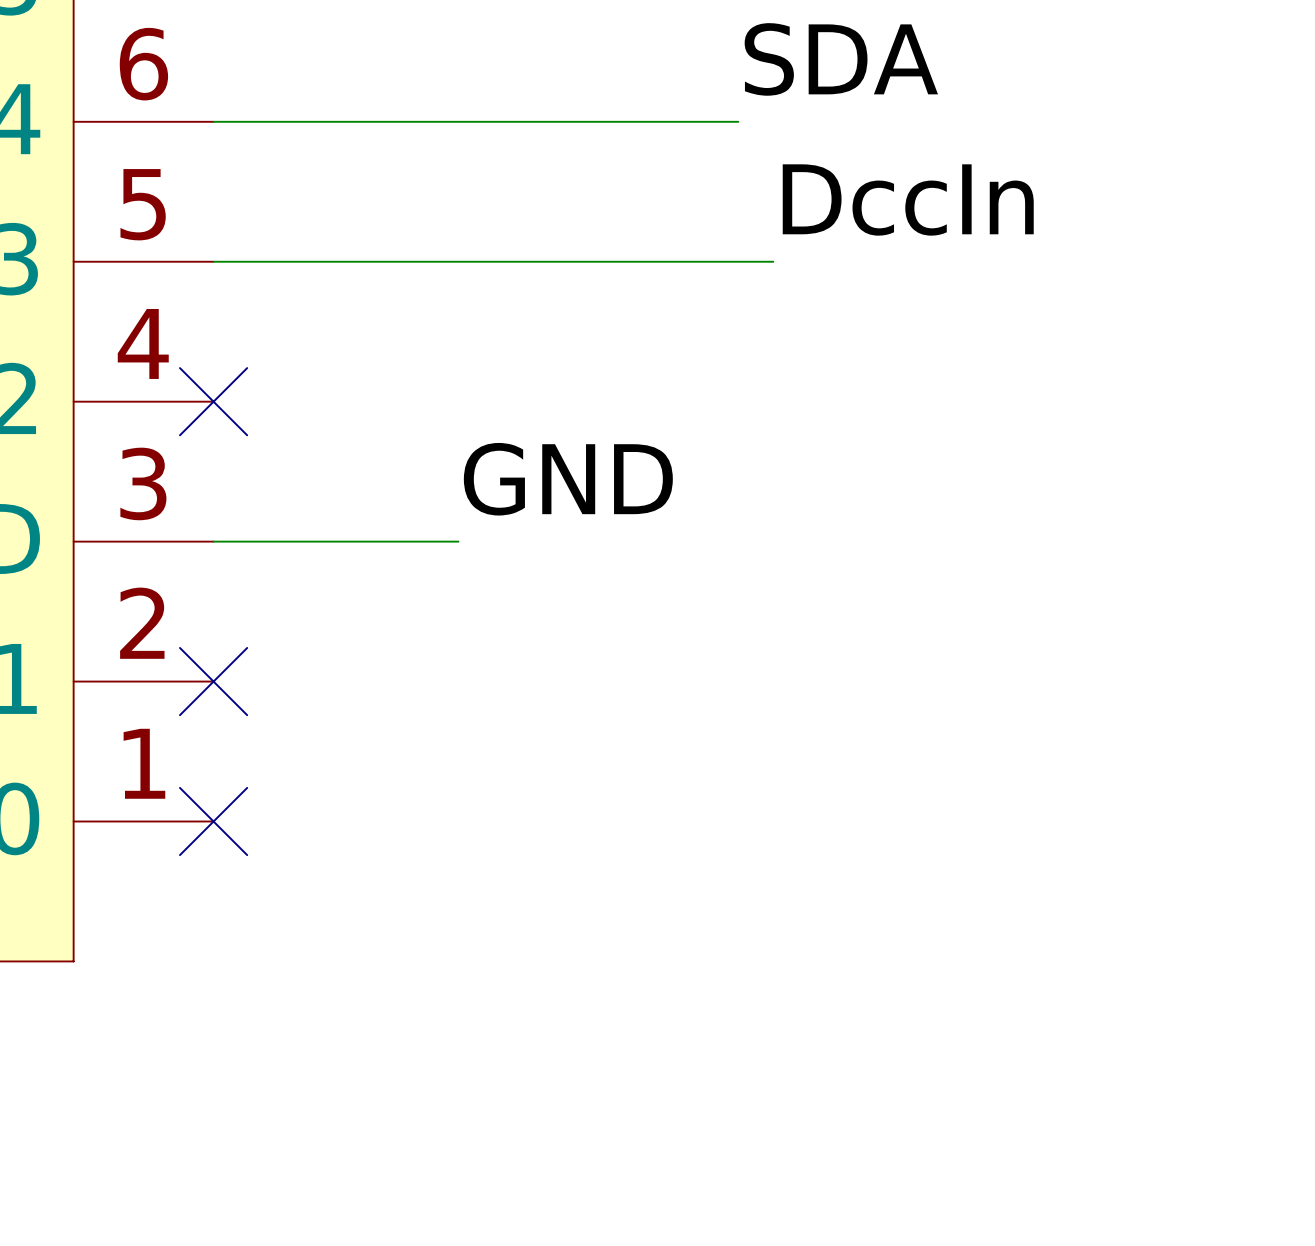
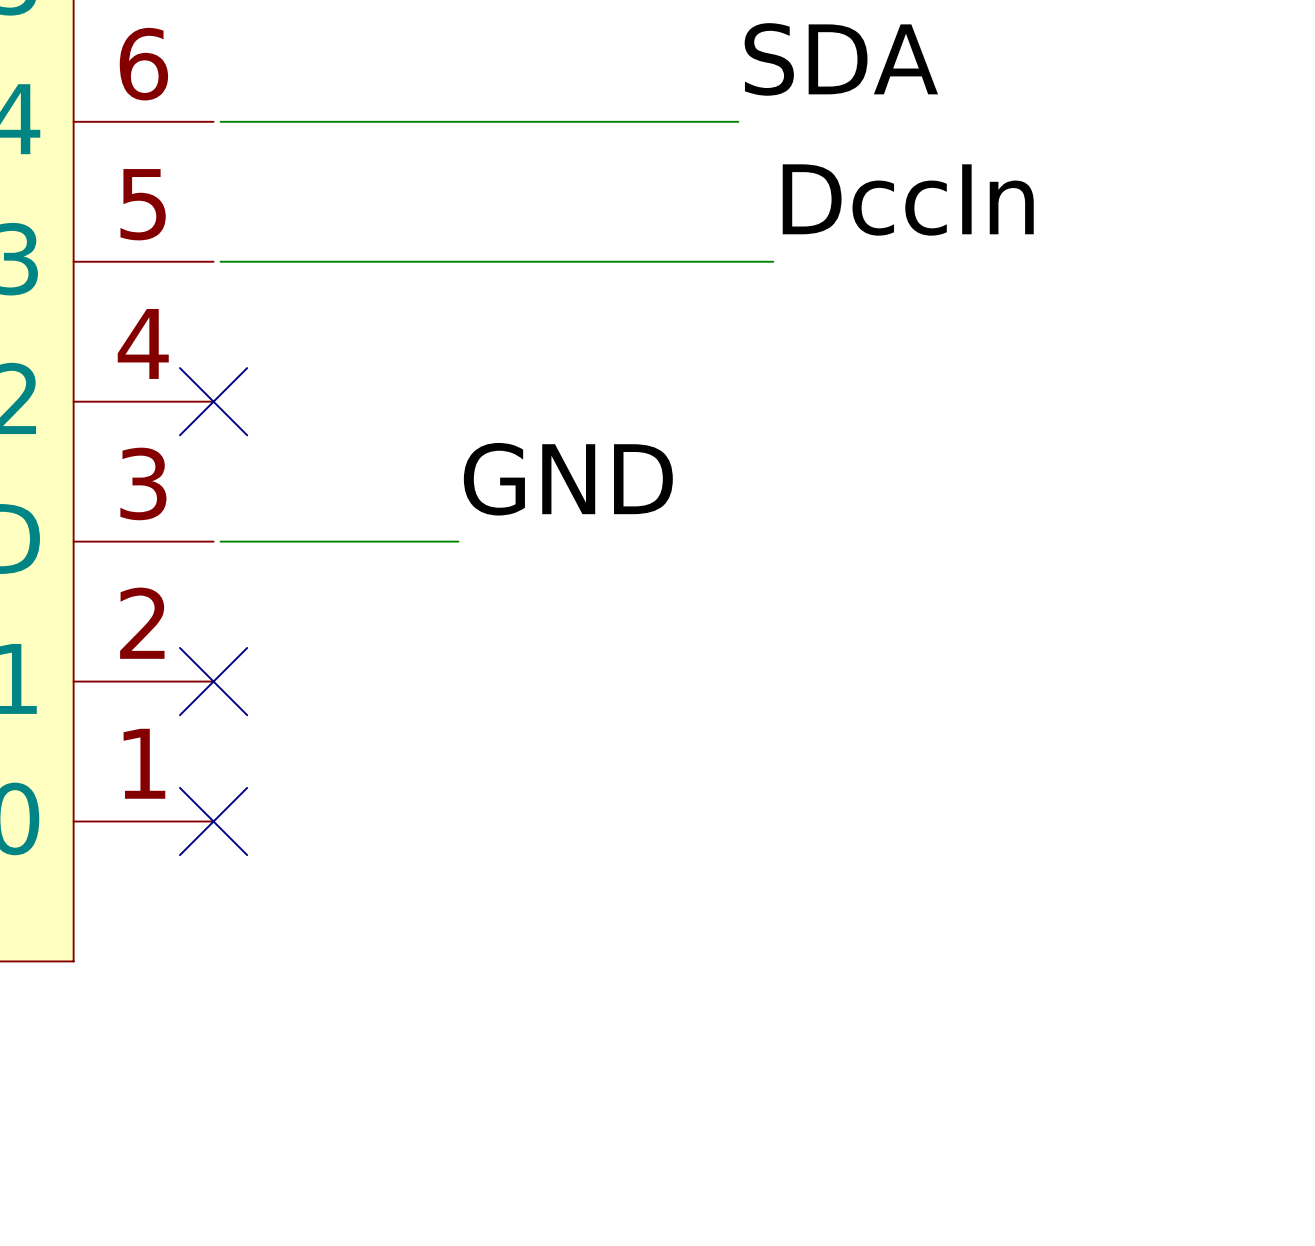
wire: (213, 121) (220, 121) -> none
wire: (213, 261) (220, 261) -> none
wire: (213, 541) (220, 541) -> none

